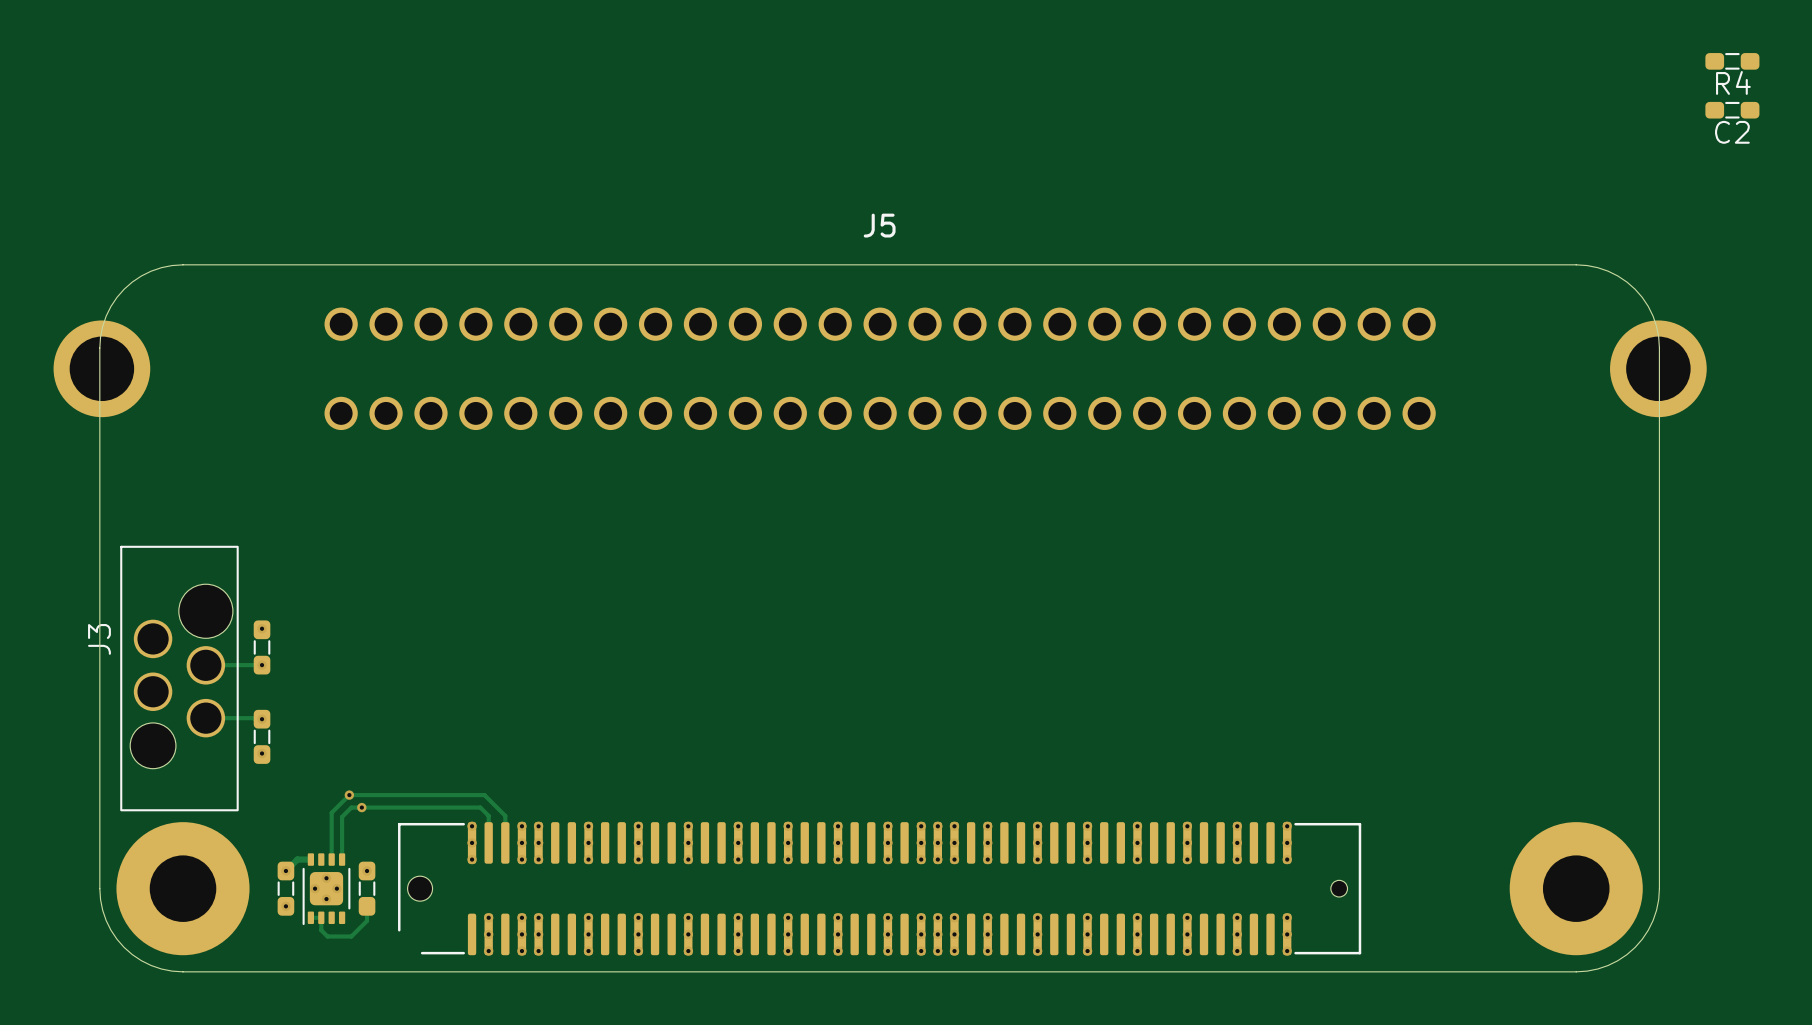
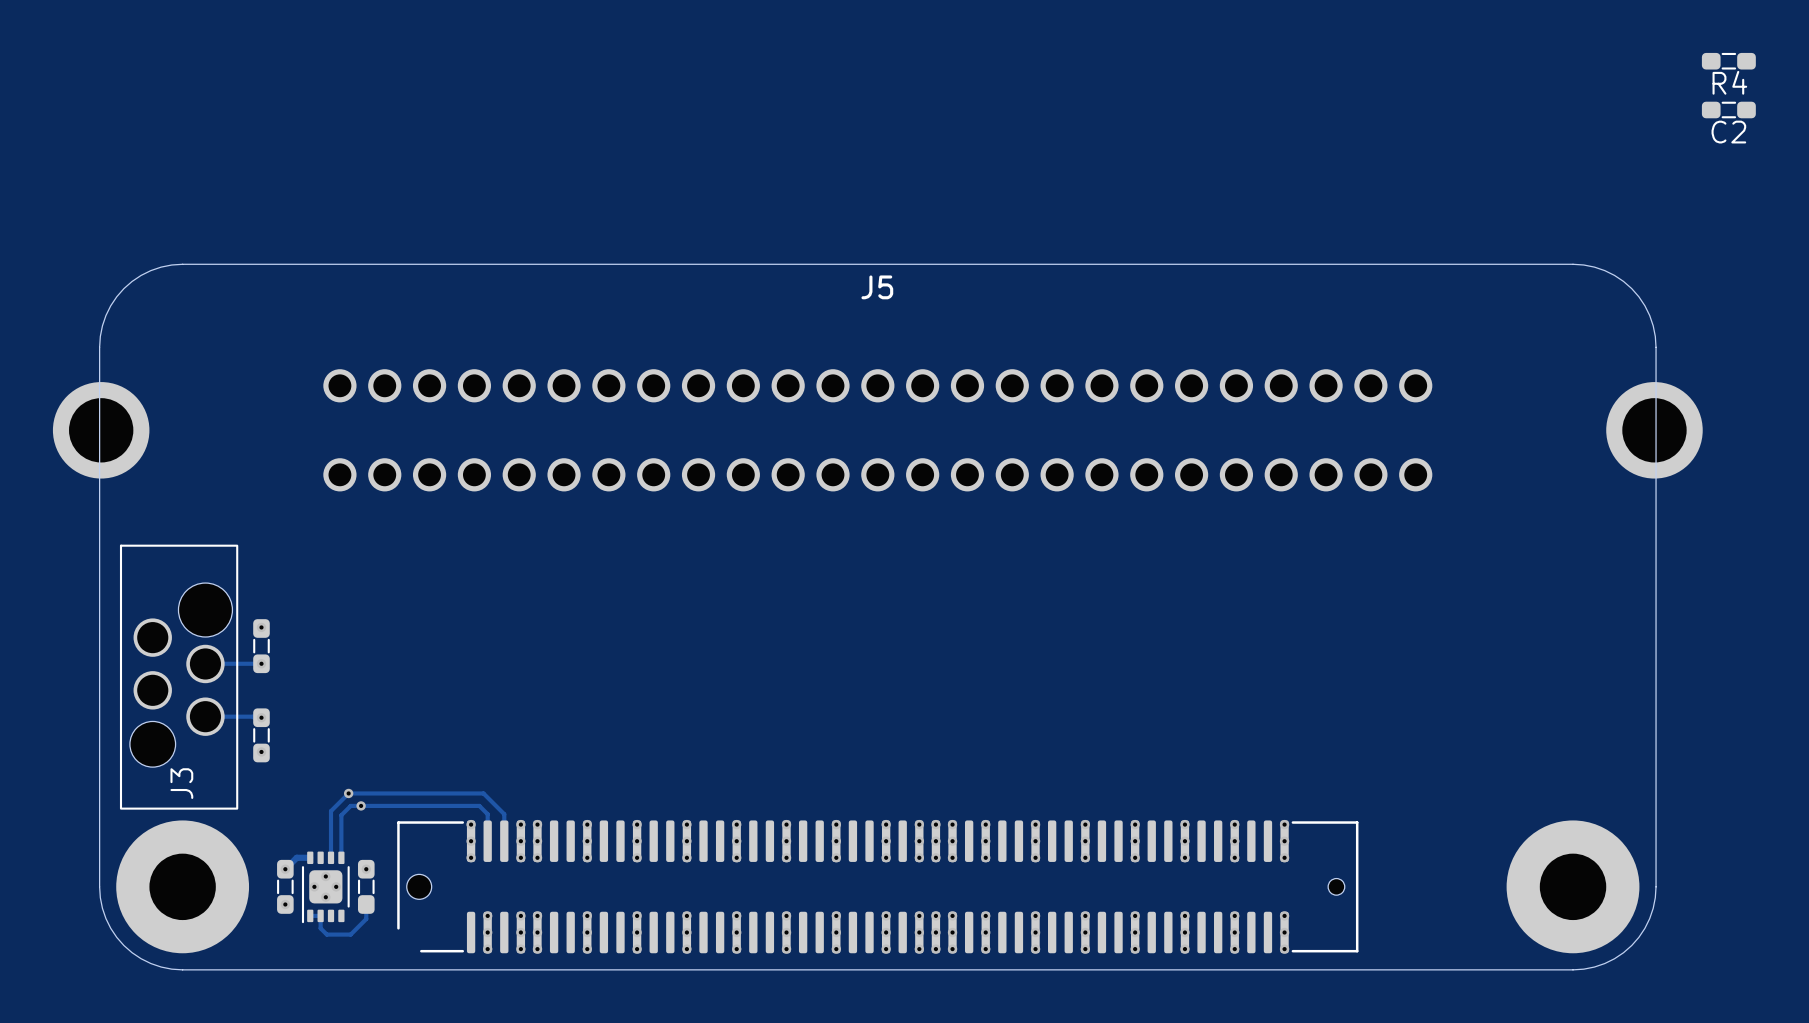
J5 position: (880, 368) -> (877, 430)
J3 name position: J3 (99, 639) -> J3 (181, 783)

